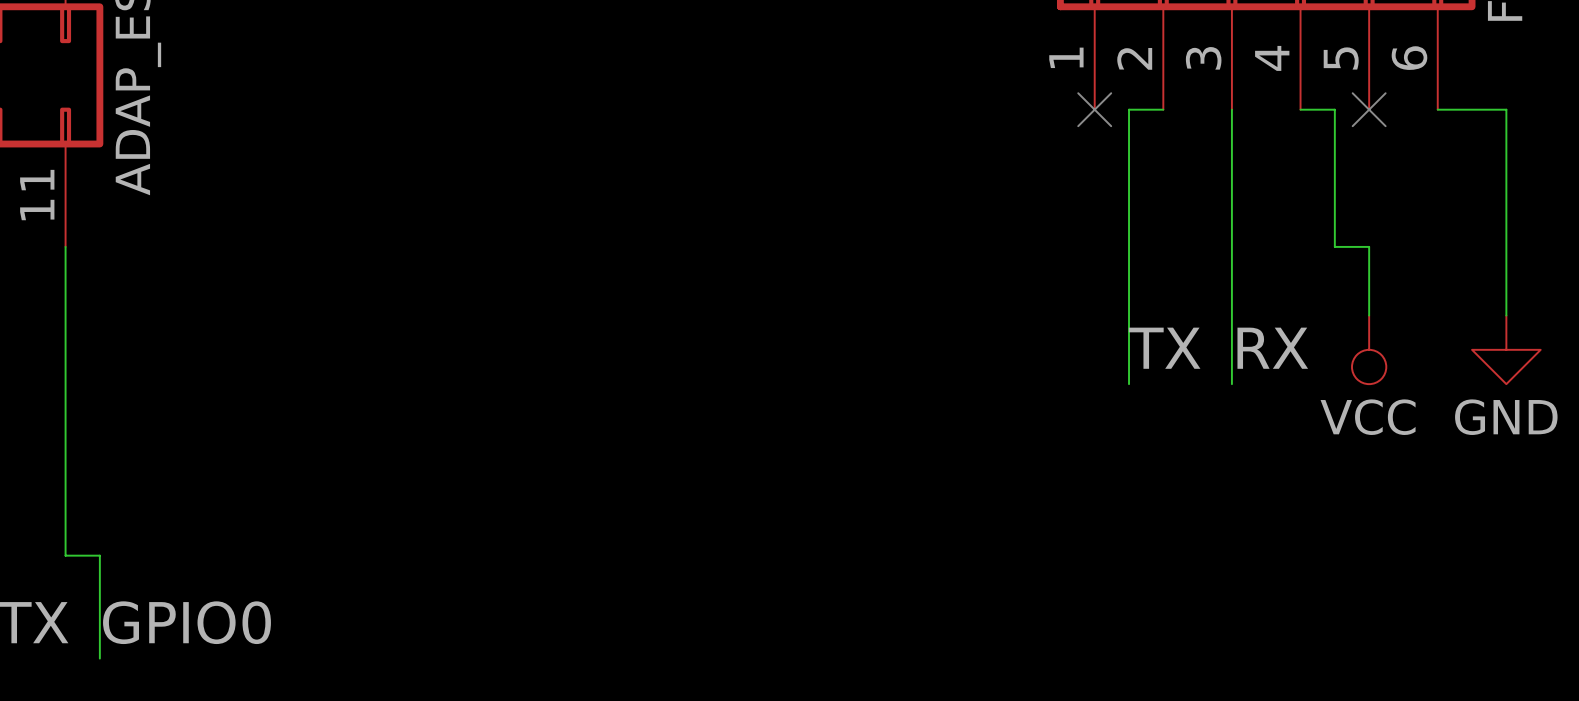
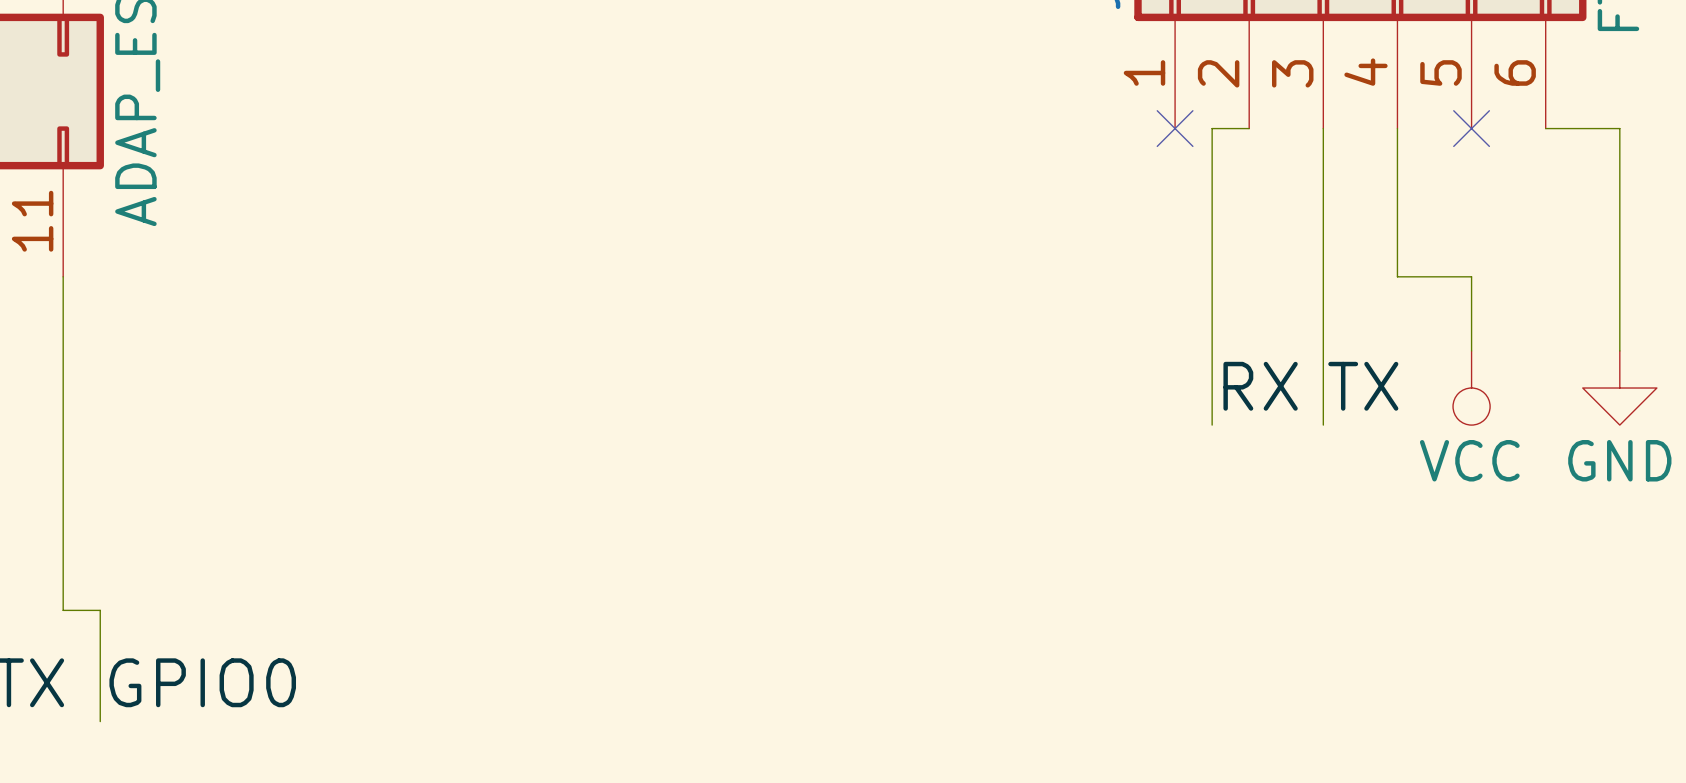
wire: (1300, 109) (1334, 109) (1334, 246) -> (1397, 128) (1397, 276) (1434, 276)
label: TX (1164, 348) -> RX (1260, 386)
label: RX (1272, 348) -> TX (1363, 386)

